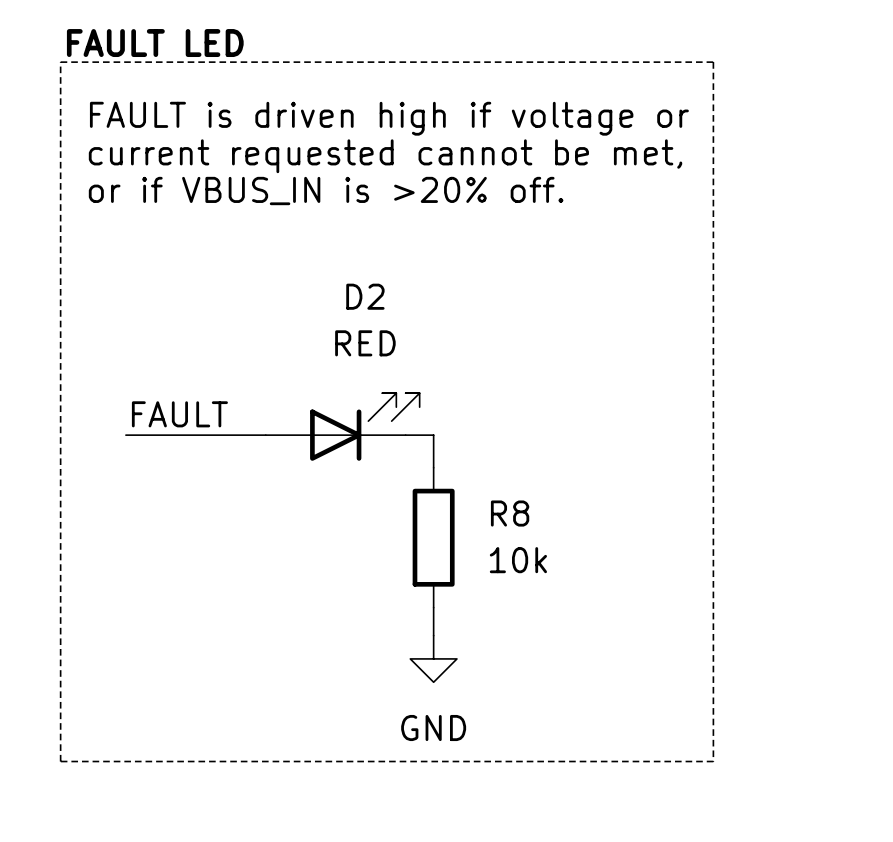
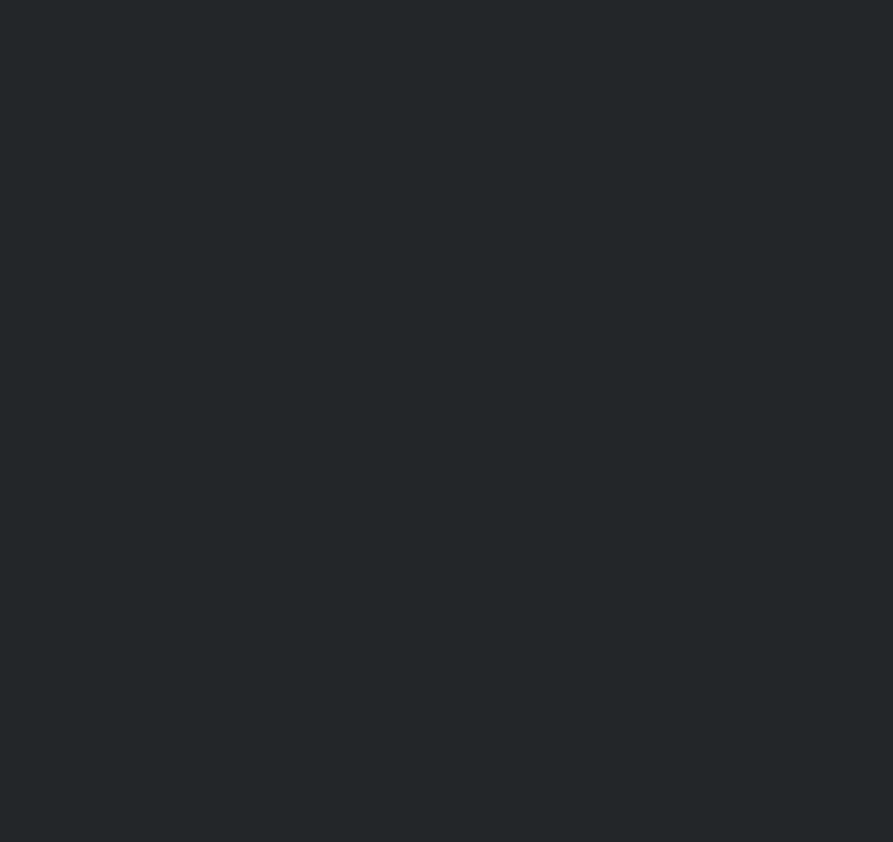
text: FAULT LED (155, 43) -> none
line: (60, 62) (713, 62) (713, 761) (60, 761) (60, 62) -> none
text: FAULT is driven high if voltage or (389, 118) -> none
text: current requested cannot be met, (385, 156) -> none
text: or if VBUS_IN is >20% off. (326, 191) -> none
label: FAULT (179, 414) -> none
D2: RED (342, 426) -> none
wire: (125, 435) (265, 435) -> none
wire: (405, 435) (433, 435) (433, 467) -> none
R8: 10k (433, 537) -> none
wire: (433, 607) (433, 635) -> none
power symbol: GND (433, 658) -> none

